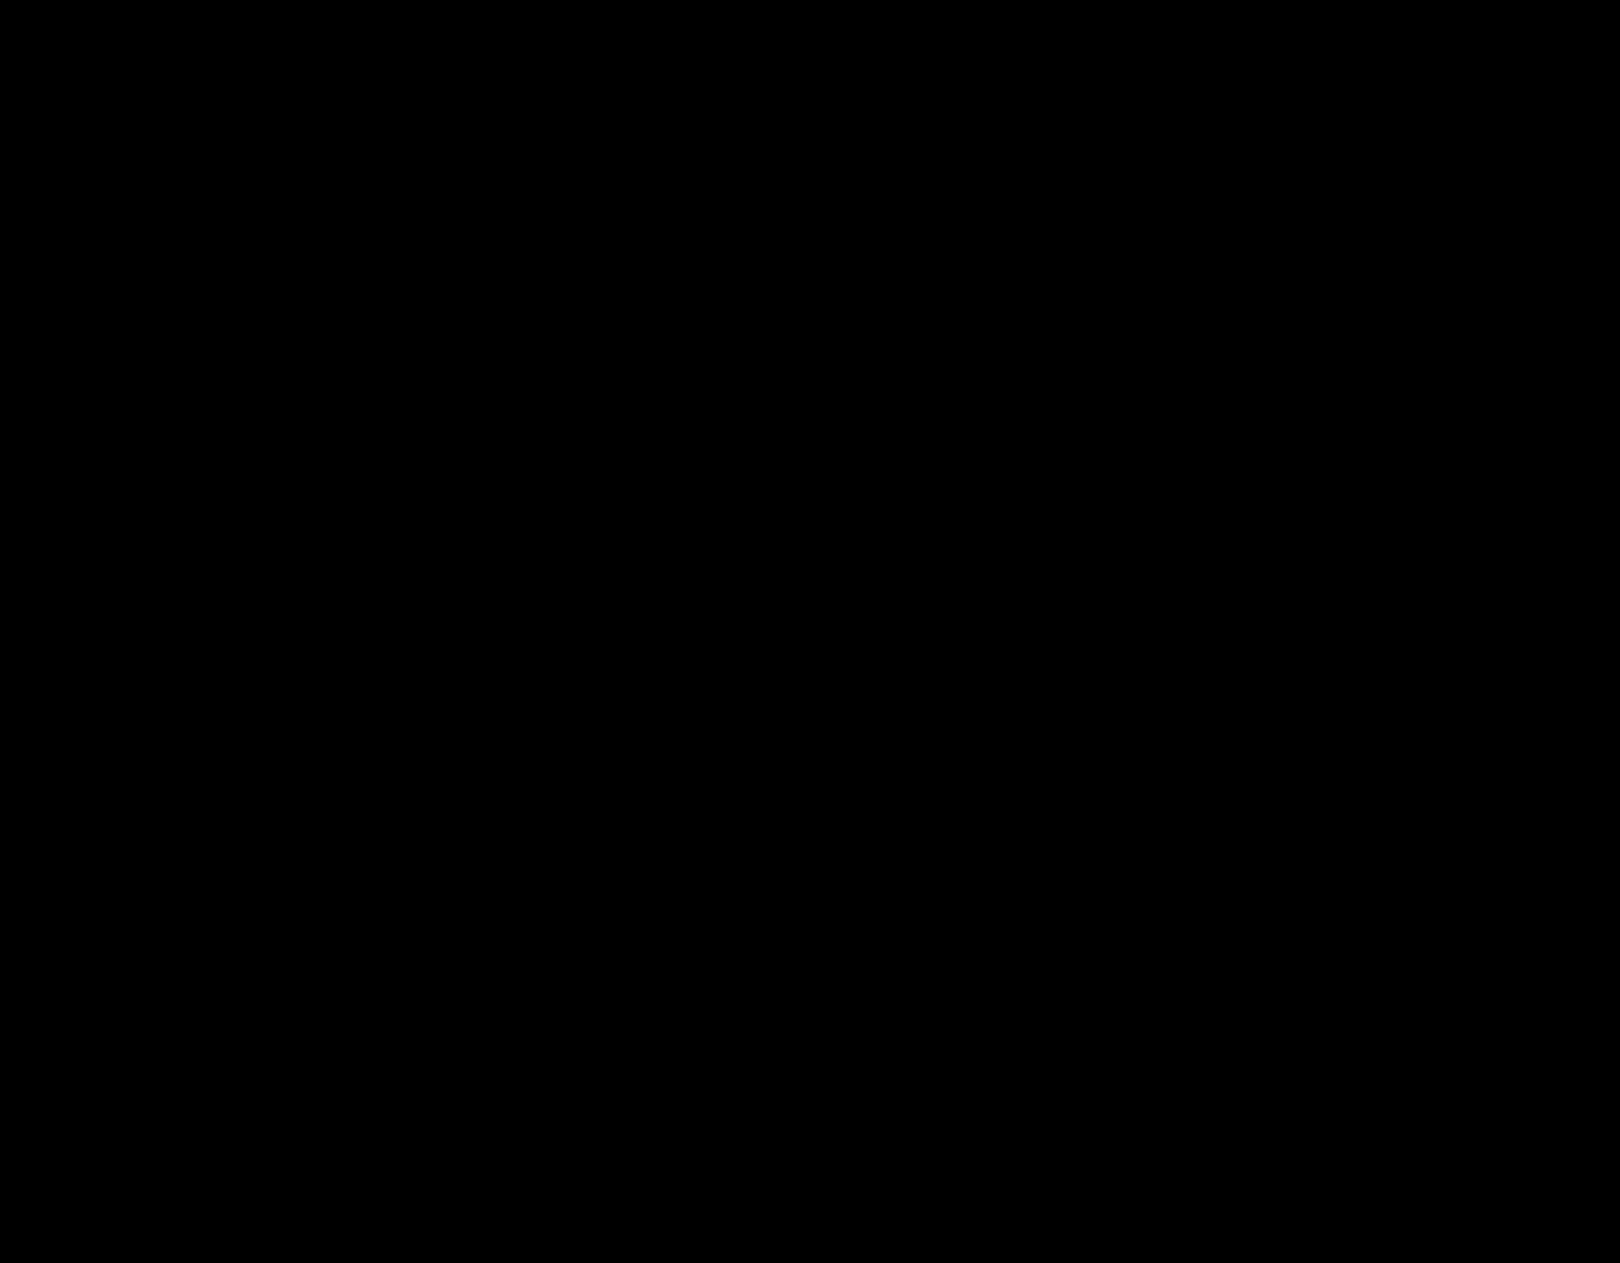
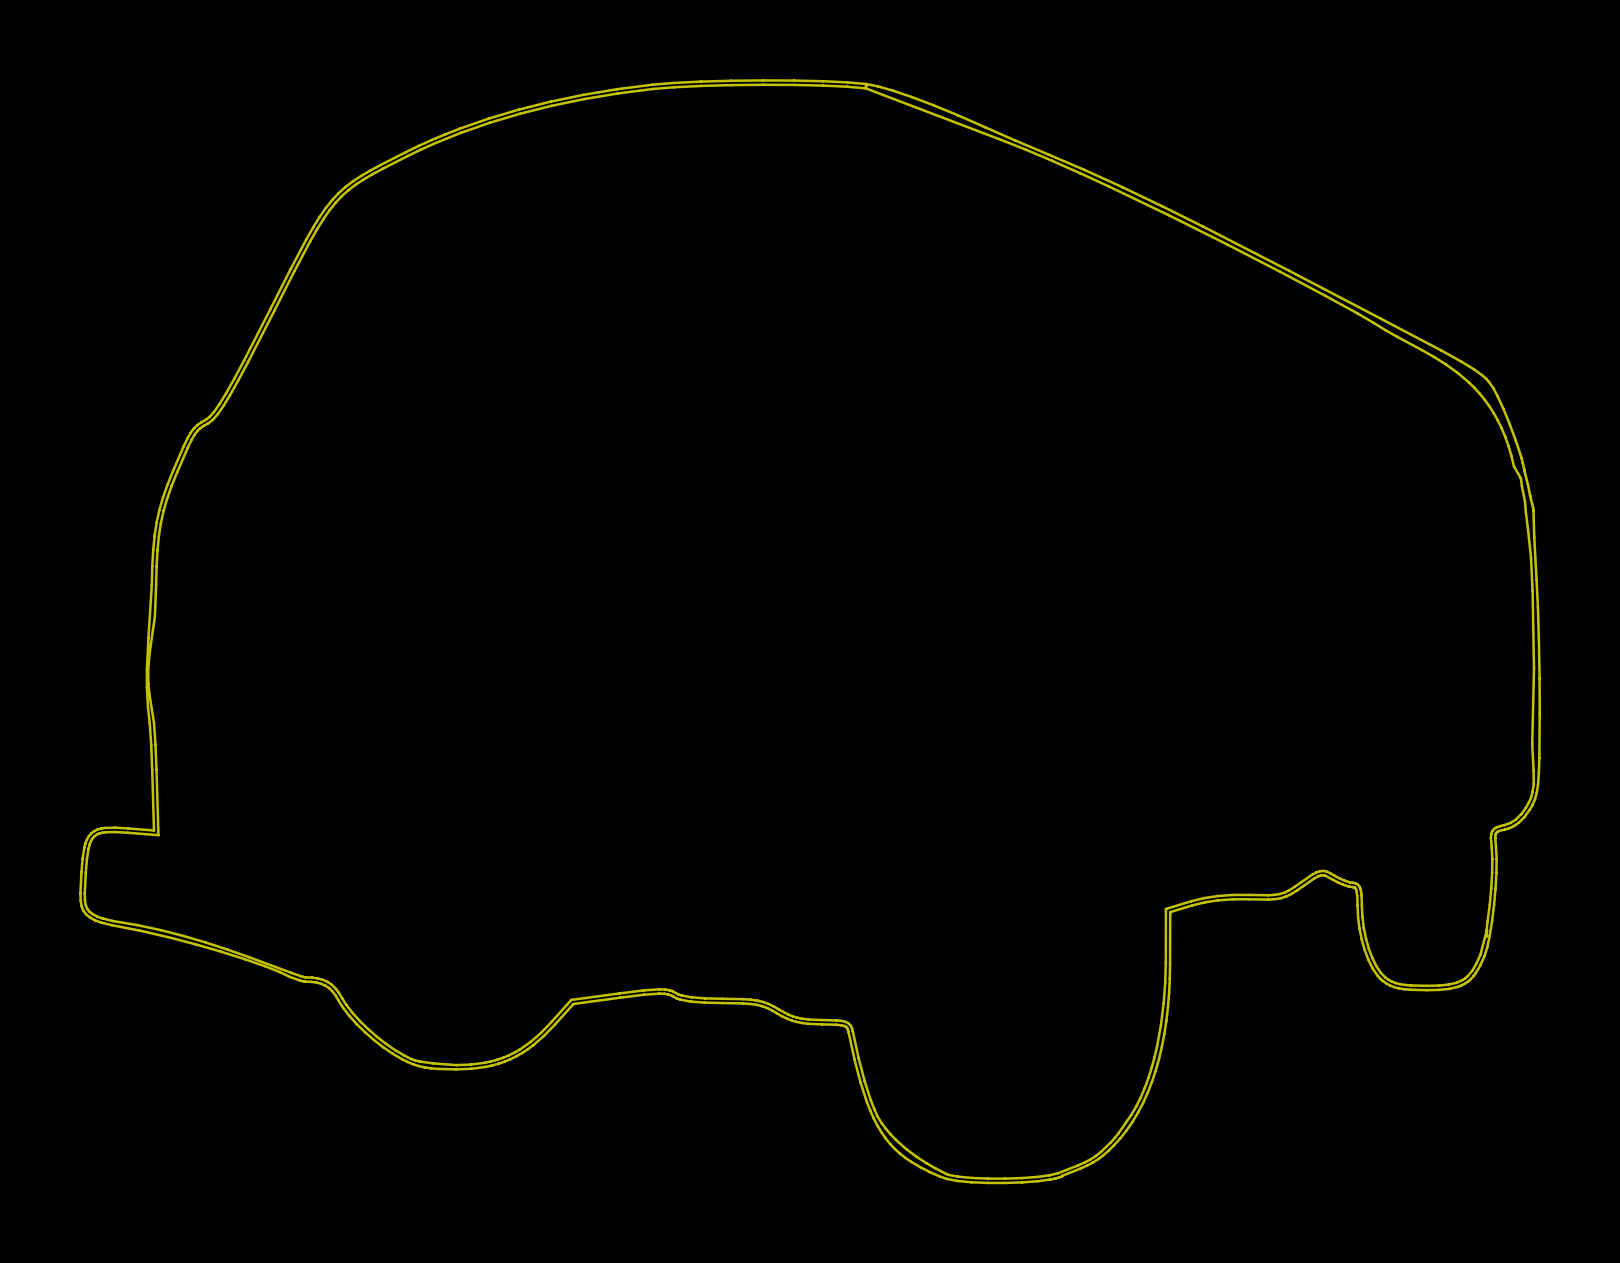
board edge: none -> (866, 84) (893, 90) (933, 105) (1122, 187) (1289, 270) (1473, 369) (1488, 381) (1503, 408) (1521, 457) (1530, 496)
board edge: none -> (866, 84) (794, 80) (701, 81) (652, 84) (583, 94) (519, 109) (445, 134) (370, 170) (338, 193) (325, 207) (306, 239) (219, 404) (209, 416) (197, 424) (190, 432) (167, 484) (159, 509) (154, 535) (146, 668) (154, 830) (105, 827) (91, 833) (85, 843) (82, 858) (80, 893) (81, 906) (86, 914) (101, 922) (195, 944) (244, 959) (299, 980) (325, 985) (332, 991) (349, 1015) (373, 1040) (402, 1059) (424, 1067) (471, 1068) (498, 1063) (516, 1056) (533, 1045) (573, 1003) (644, 994) (664, 993) (690, 1001) (756, 1004) (796, 1021) (844, 1025) (847, 1029) (860, 1082) (873, 1118) (885, 1138) (905, 1157) (939, 1176) (957, 1180) (1021, 1182) (1062, 1176)
board edge: none -> (865, 88) (794, 84) (701, 85) (652, 89) (584, 99) (520, 113) (461, 132) (382, 168) (355, 184) (341, 196) (329, 210) (310, 241) (223, 406) (212, 419) (194, 434) (171, 486) (163, 510) (158, 536) (154, 615) (148, 674) (155, 744) (158, 835) (115, 832) (101, 832) (94, 836) (89, 844) (86, 858) (84, 893) (87, 908) (92, 914) (102, 918) (183, 935) (300, 976) (327, 981) (335, 988) (352, 1013) (376, 1036) (404, 1055) (419, 1061) (456, 1065) (497, 1059) (514, 1052) (530, 1041) (571, 999) (643, 990) (664, 989) (691, 997) (757, 1000) (797, 1017) (845, 1021) (852, 1028) (864, 1081) (874, 1109) (890, 1134) (916, 1156) (948, 1174) (987, 1178) (1049, 1175) (1078, 1165) (1100, 1152) (1114, 1137) (1131, 1114) (1148, 1077) (1160, 1024) (1165, 982) (1165, 908) (1218, 896) (1280, 893) (1316, 872) (1327, 871) (1359, 886) (1365, 938) (1376, 966) (1388, 979) (1410, 985) (1448, 984) (1465, 978) (1472, 970) (1480, 954) (1486, 930)
board edge: none -> (865, 88) (1052, 160) (1226, 244) (1324, 295) (1434, 357) (1457, 373) (1484, 399) (1501, 428) (1513, 466) (1520, 478) (1530, 556) (1534, 668) (1532, 791) (1528, 802) (1521, 814) (1510, 822) (1494, 828) (1491, 834) (1492, 872) (1486, 936) (1487, 930)
board edge: none -> (1530, 496) (1533, 510) (1538, 641) (1538, 784) (1535, 799) (1524, 817) (1512, 826) (1495, 833) (1496, 872) (1492, 920) (1487, 947) (1475, 973) (1464, 983) (1449, 988) (1410, 989) (1398, 988) (1386, 983) (1372, 968) (1364, 950) (1359, 928) (1355, 888) (1323, 875) (1281, 898) (1218, 900) (1170, 912) (1169, 978) (1166, 1020) (1158, 1059) (1147, 1092) (1132, 1121) (1108, 1150) (1093, 1162) (1062, 1175)

